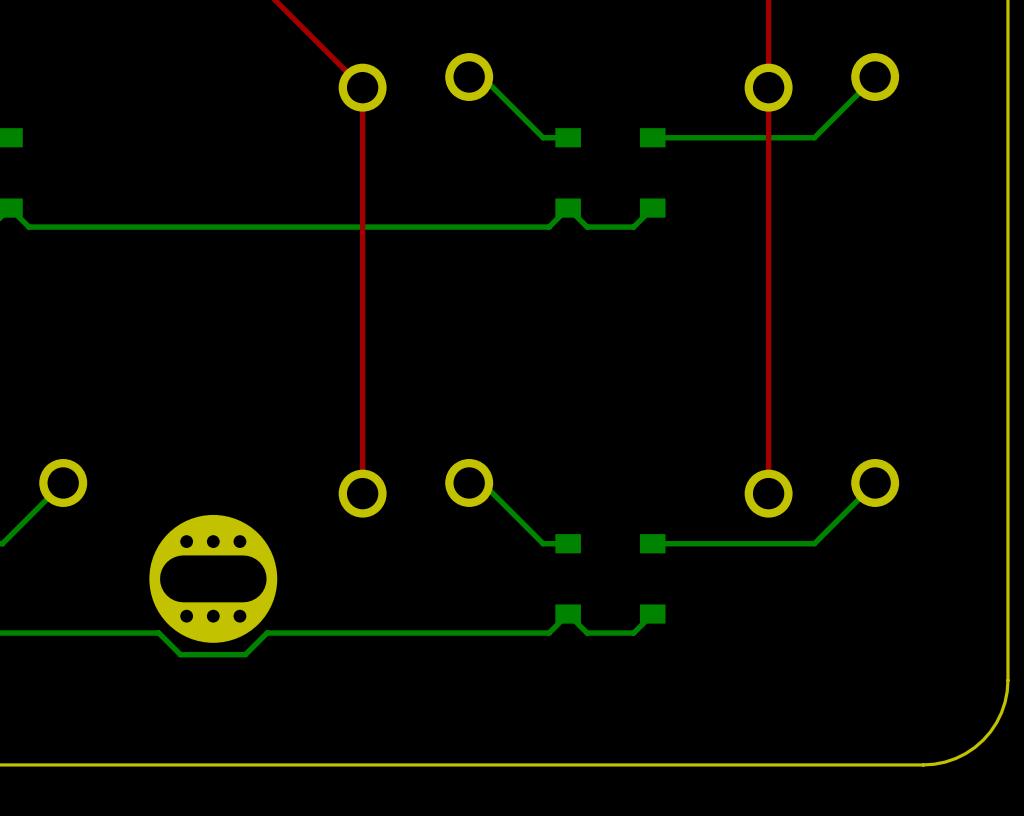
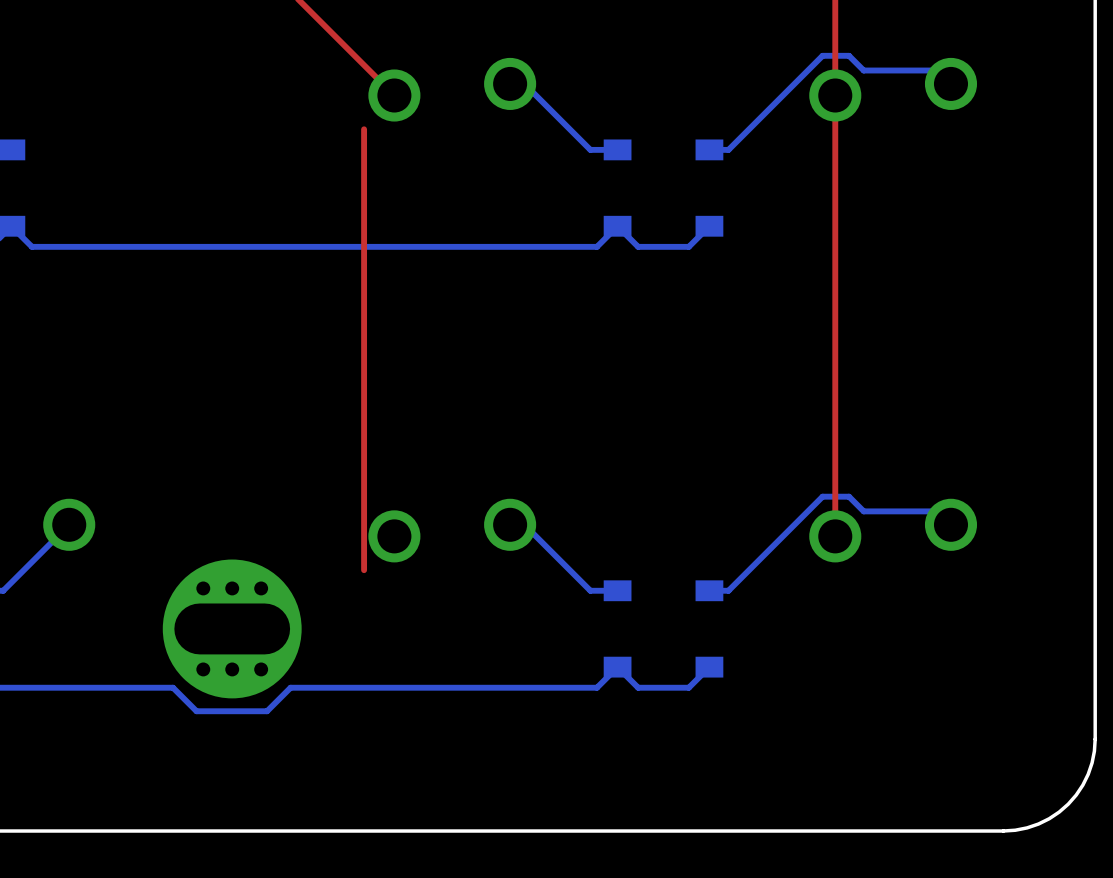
bottom track: (875, 77) (814, 137) (670, 137) -> (951, 70) (863, 70) (849, 55) (822, 55) (728, 149)
top track: (362, 87) (362, 493) -> (364, 129) (364, 570)
bottom track: (875, 482) (814, 543) (670, 543) -> (951, 511) (863, 511) (849, 496) (822, 496) (728, 590)

